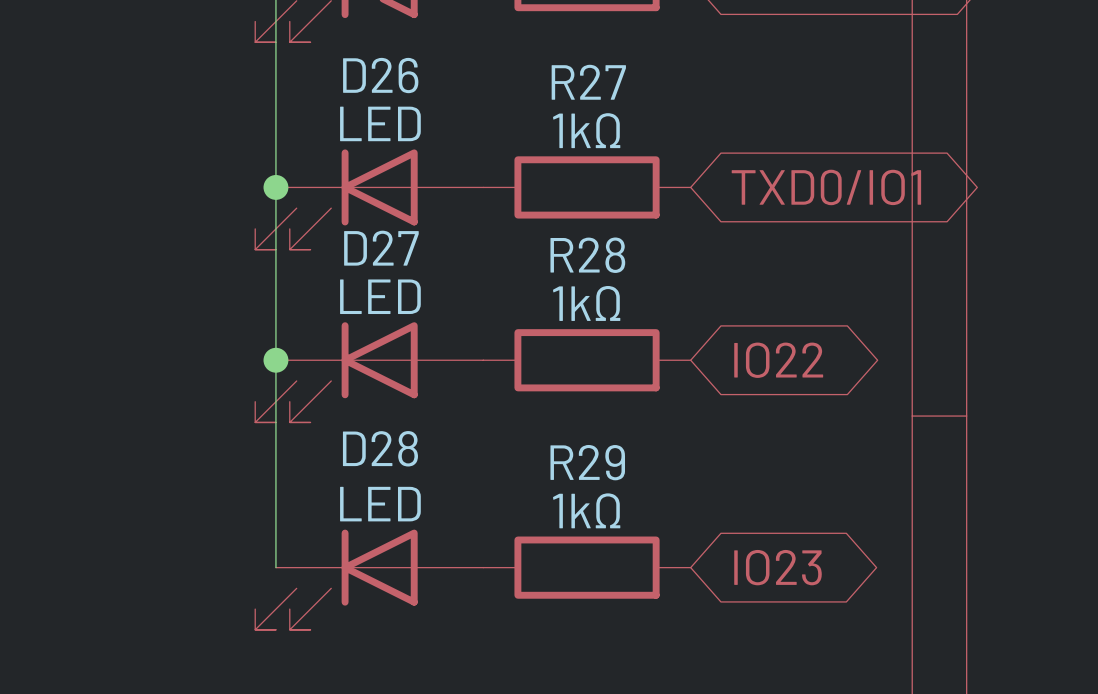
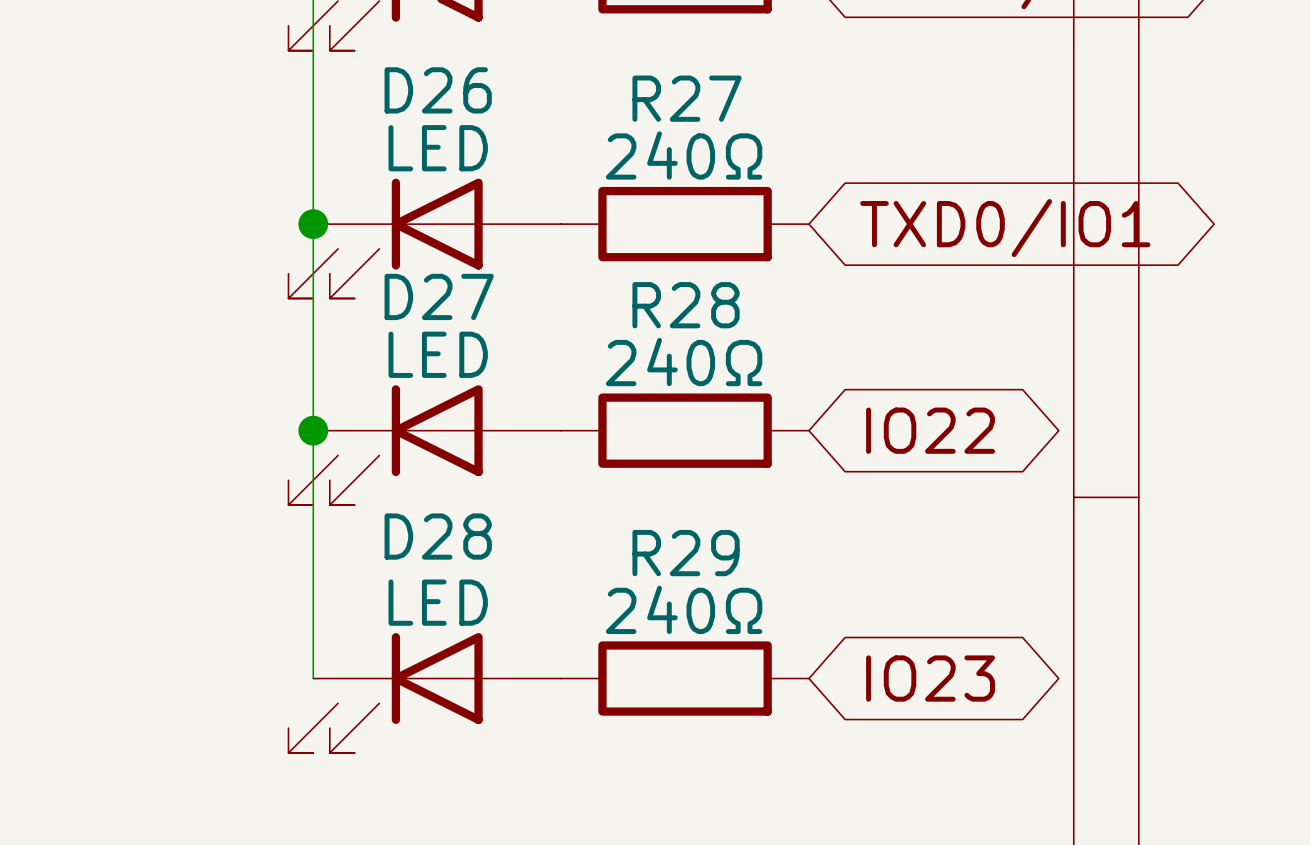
R27 value: 1kΩ (586, 130) -> 240Ω (684, 155)
R28 value: 1kΩ (586, 303) -> 240Ω (684, 362)
R29 value: 1kΩ (586, 510) -> 240Ω (684, 609)

